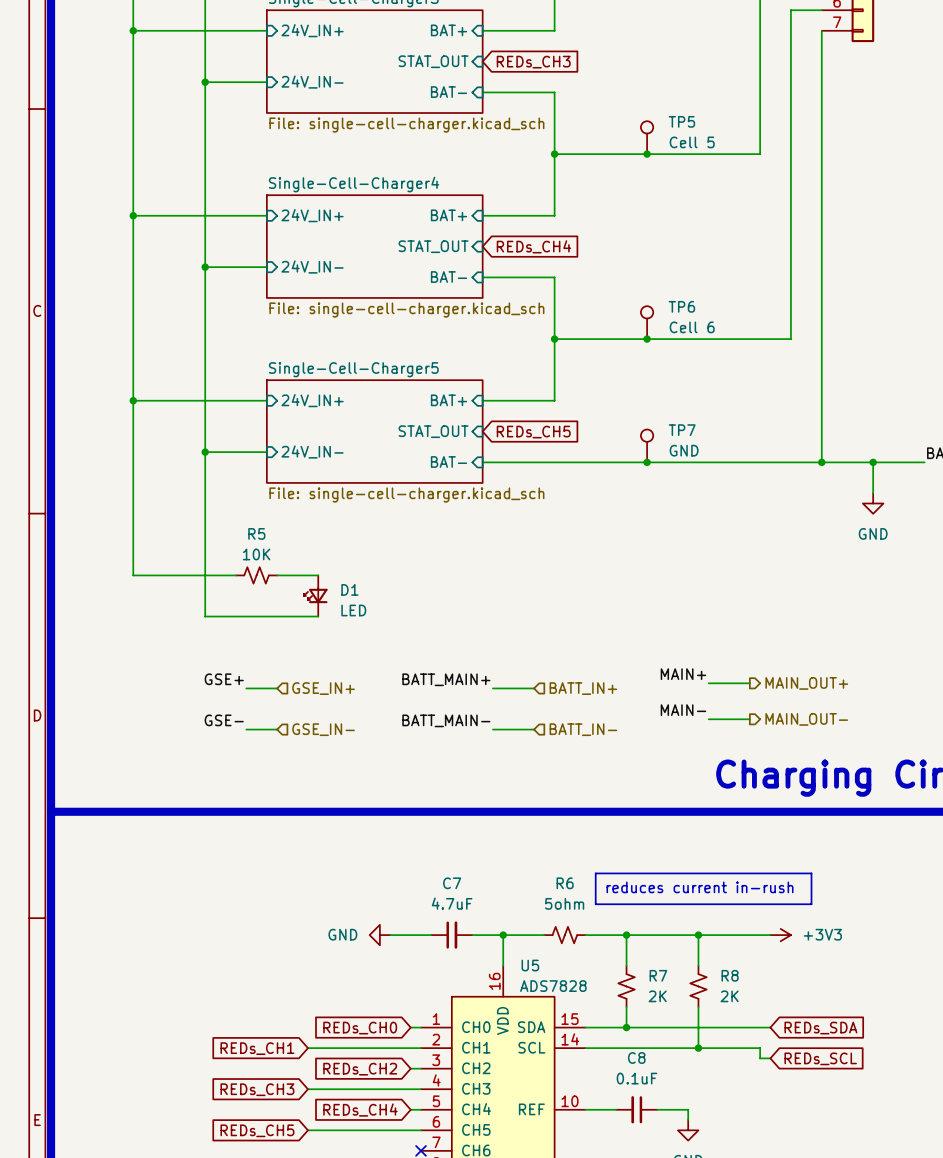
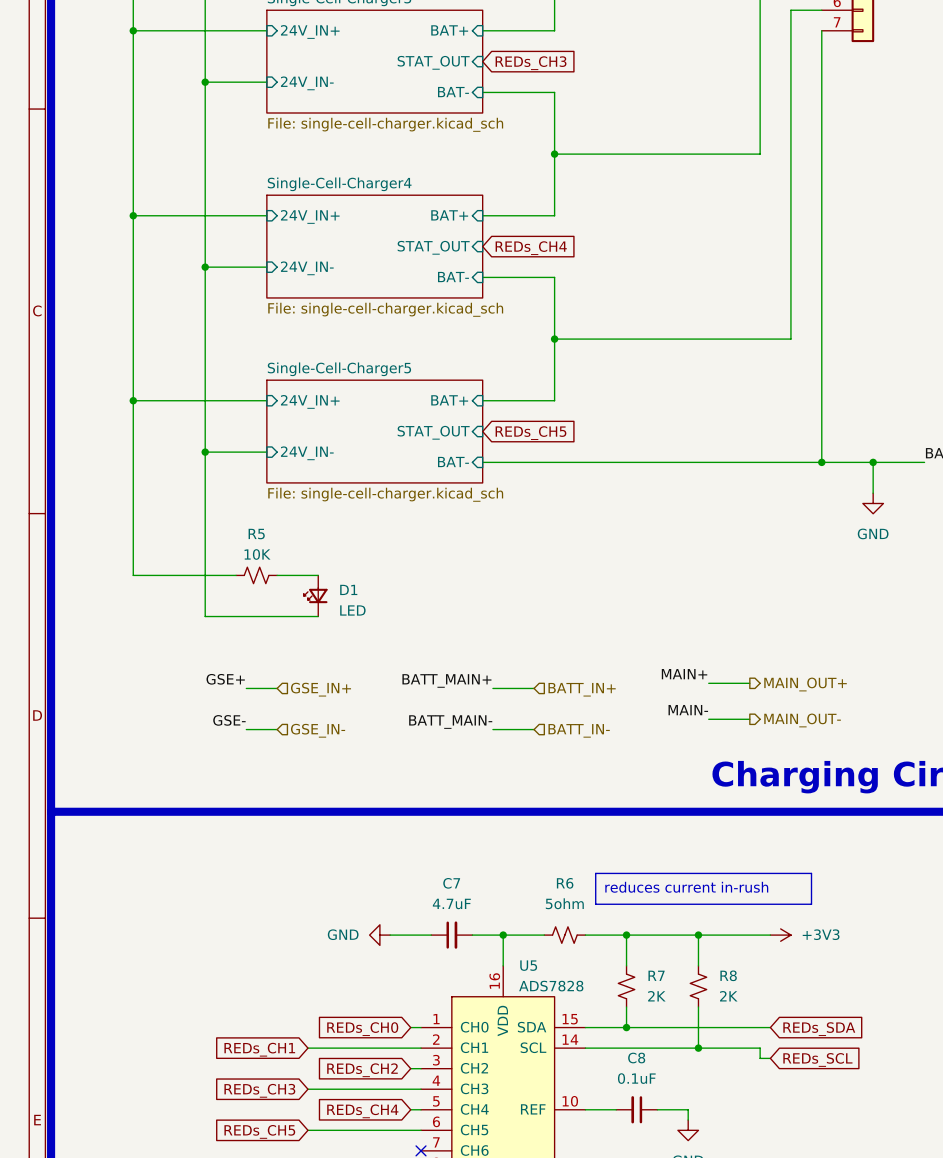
TP5: Cell 5 (647, 137) -> none
junction: (647, 154) -> none
TP6: Cell 6 (647, 322) -> none
junction: (647, 339) -> none
TP7: GND (647, 445) -> none
junction: (647, 462) -> none

